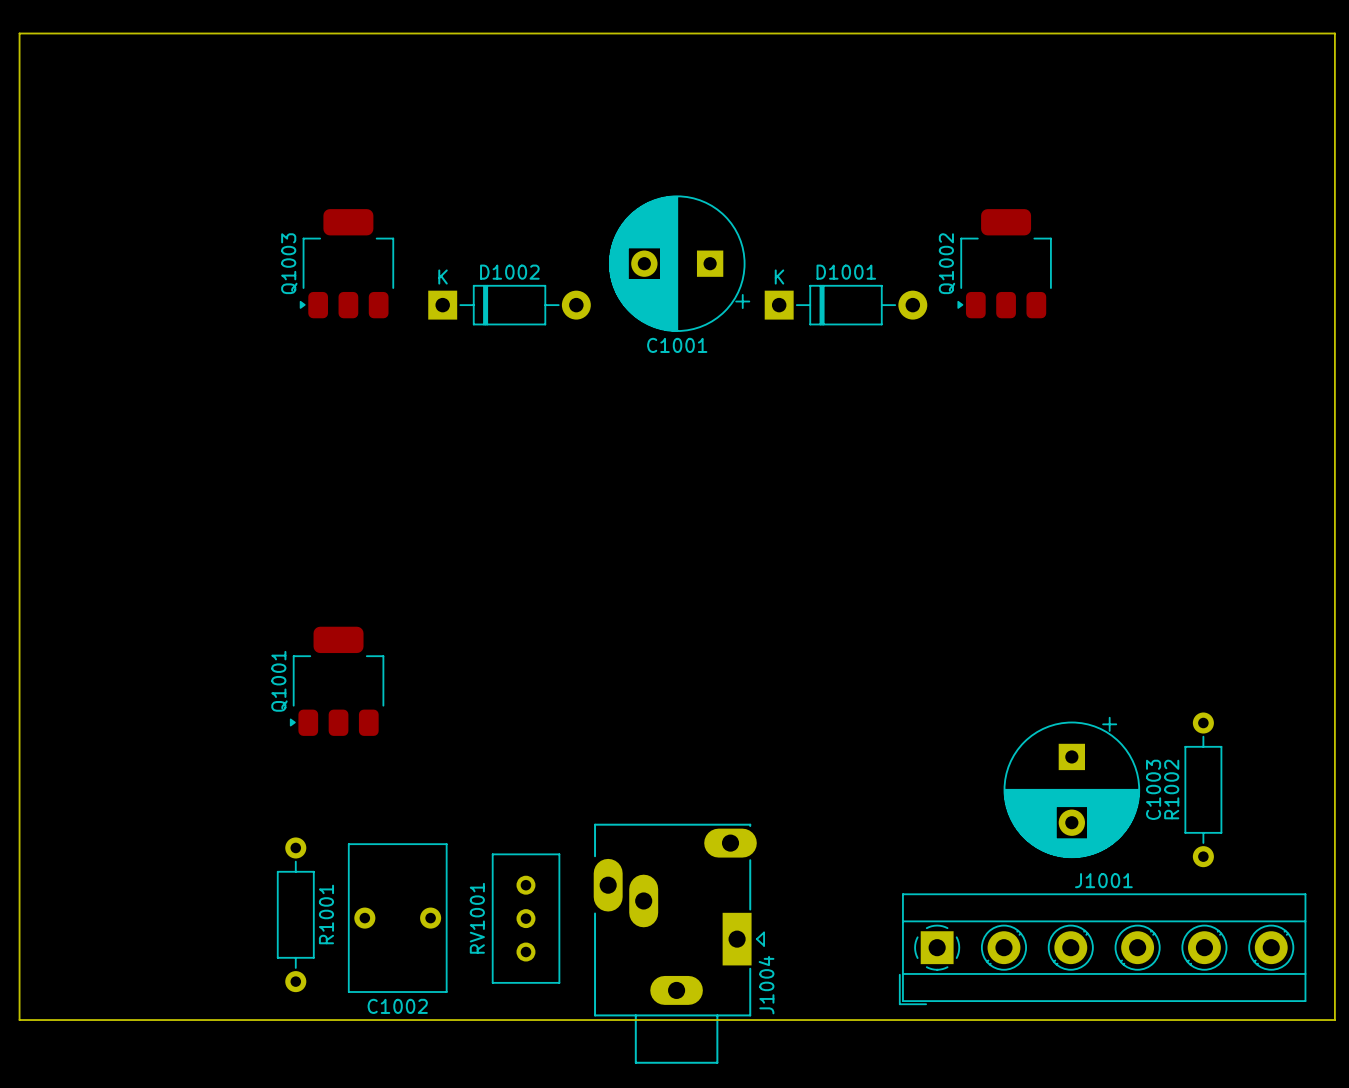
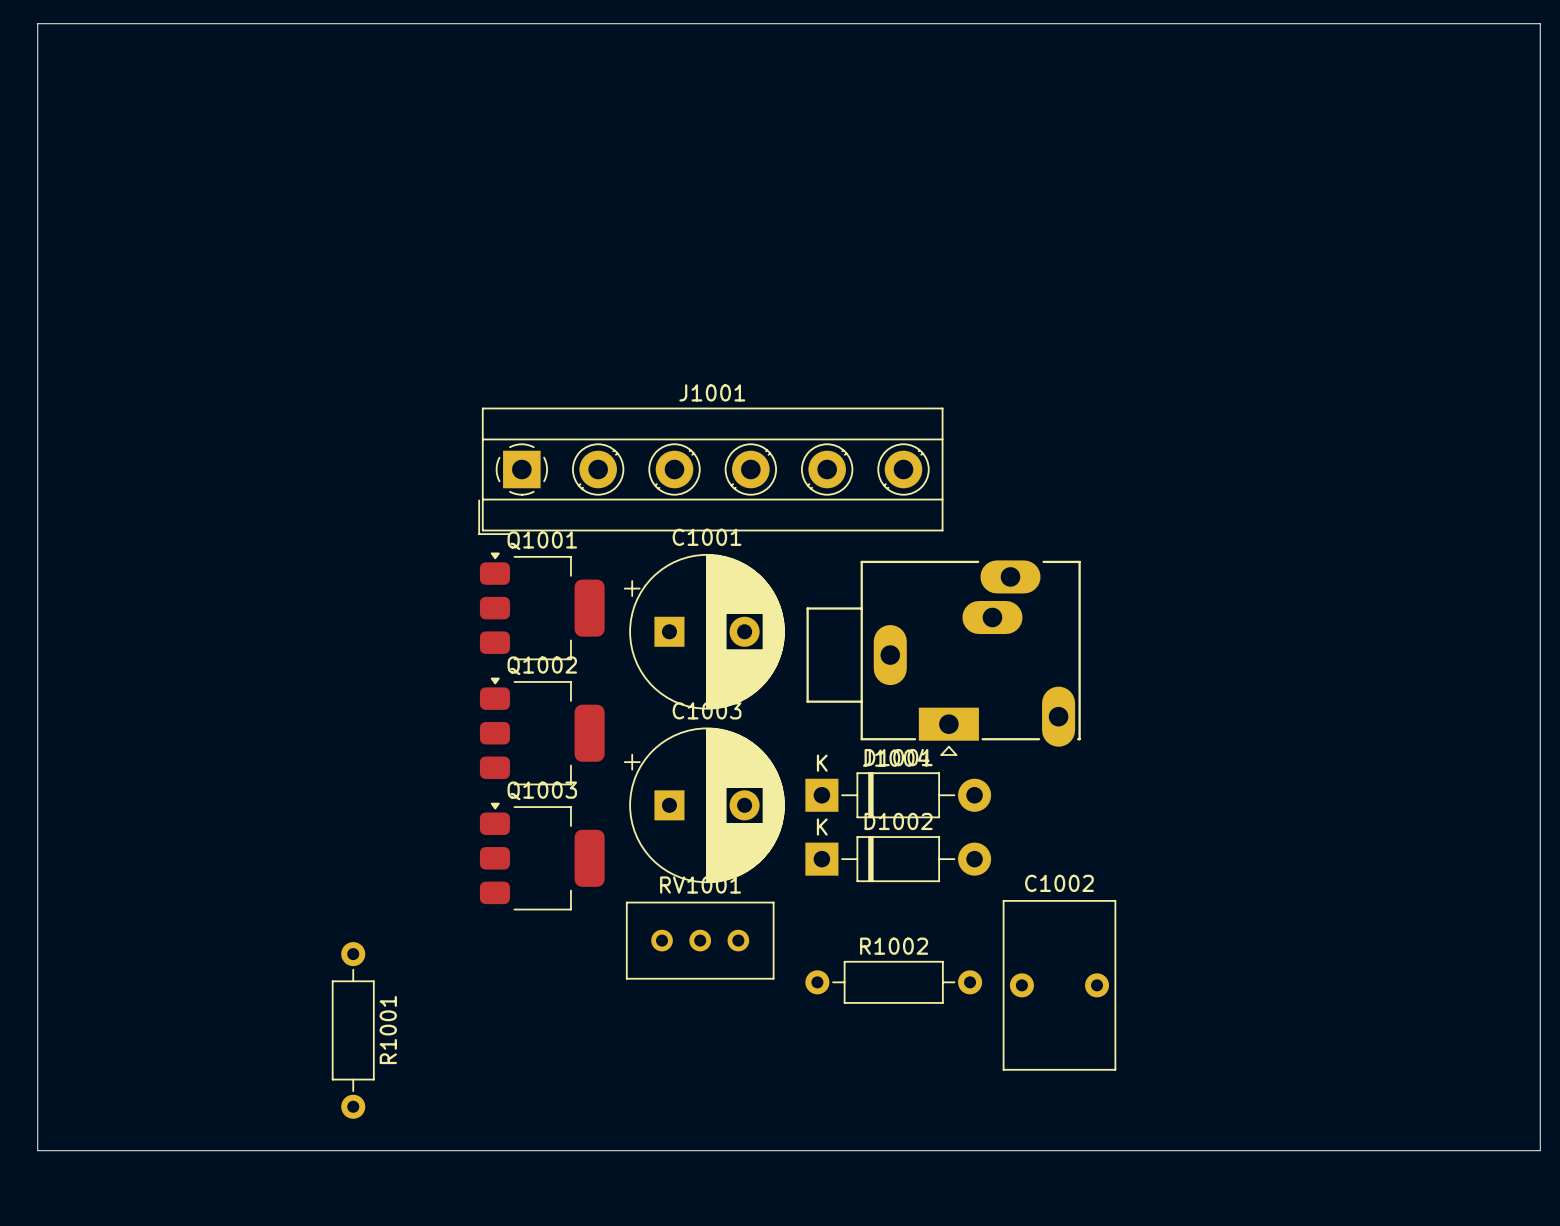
Q1003 rotation: 0° (346, 263) -> 90° clockwise (542, 856)
Q1003 position: (346, 263) -> (542, 856)
C1001 rotation: 0° (679, 263) -> 180° (704, 631)
C1001 position: (679, 263) -> (704, 631)
Q1002 rotation: 0° (1004, 263) -> 90° clockwise (542, 731)
Q1002 position: (1004, 263) -> (542, 731)
D1002 position: (509, 305) -> (898, 859)
D1001 position: (846, 305) -> (898, 795)
Q1001 rotation: 0° (337, 681) -> 90° clockwise (542, 606)
Q1001 position: (337, 681) -> (542, 606)
C1003 rotation: 0° (1071, 787) -> 90° counterclockwise (704, 805)
C1003 position: (1071, 787) -> (704, 805)
R1002 rotation: 0° (1203, 789) -> 90° clockwise (893, 982)
R1002 position: (1203, 789) -> (893, 982)
C1002 position: (397, 918) -> (1059, 985)
RV1001 rotation: 0° (526, 918) -> 90° clockwise (700, 940)
RV1001 position: (526, 918) -> (700, 940)
J1004 rotation: 0° (679, 943) -> 90° clockwise (943, 658)
J1004 position: (679, 943) -> (943, 658)
J1001 position: (1102, 949) -> (710, 471)
C1002 name position: C1002 (397, 1006) -> C1002 (1059, 883)

